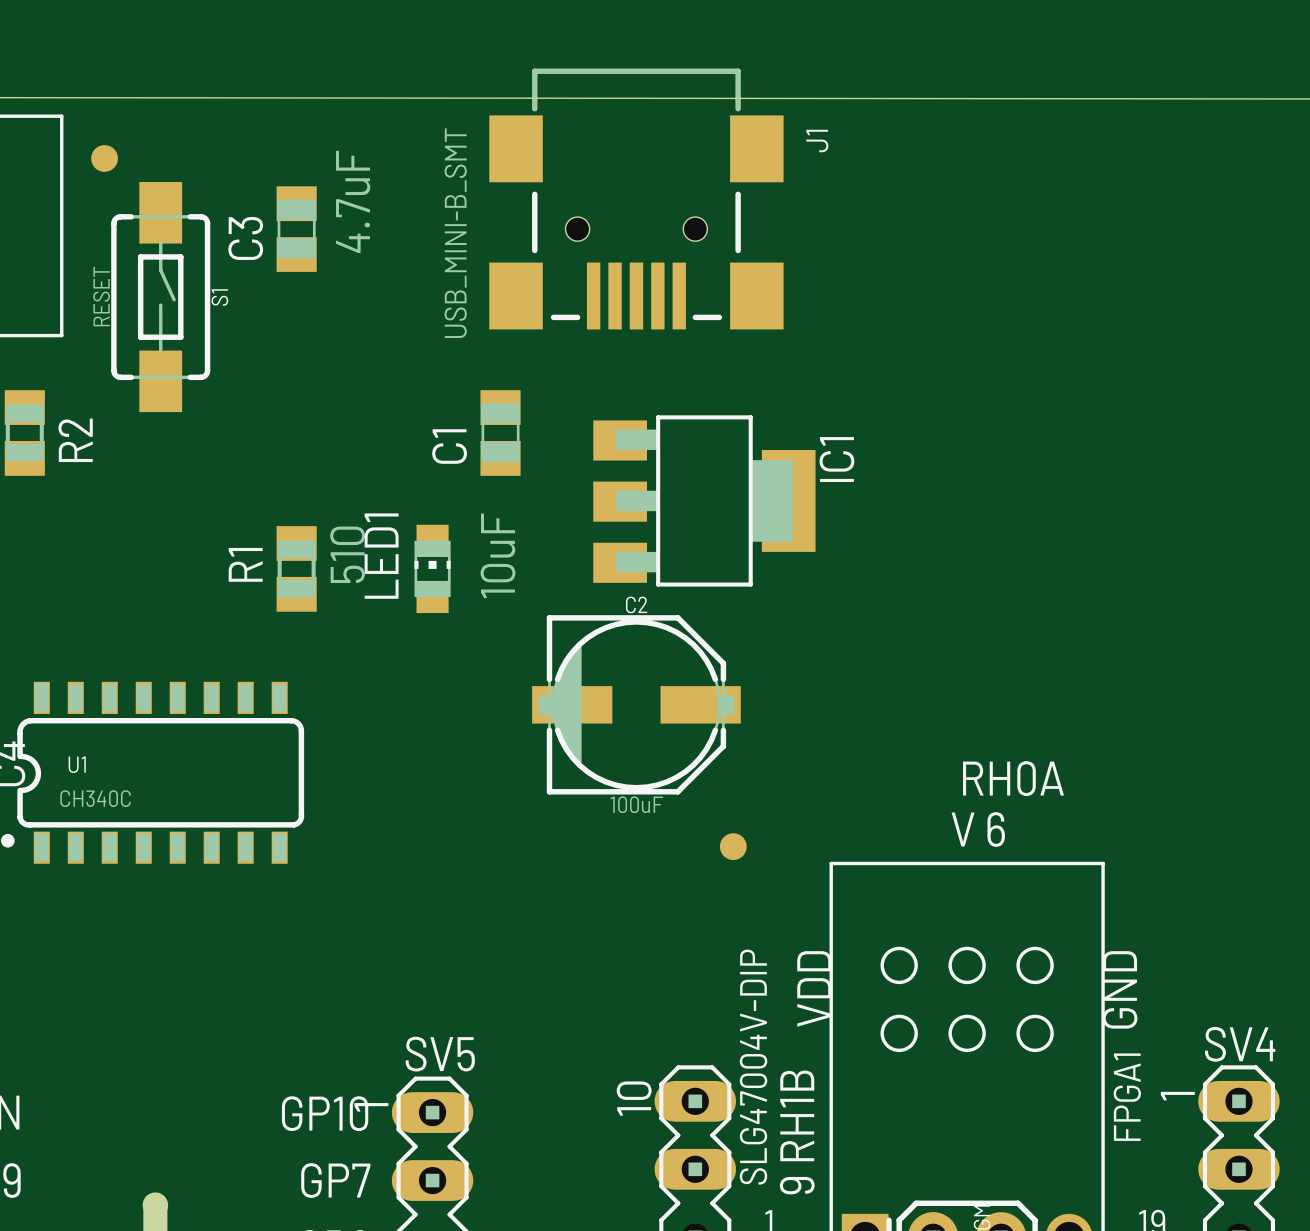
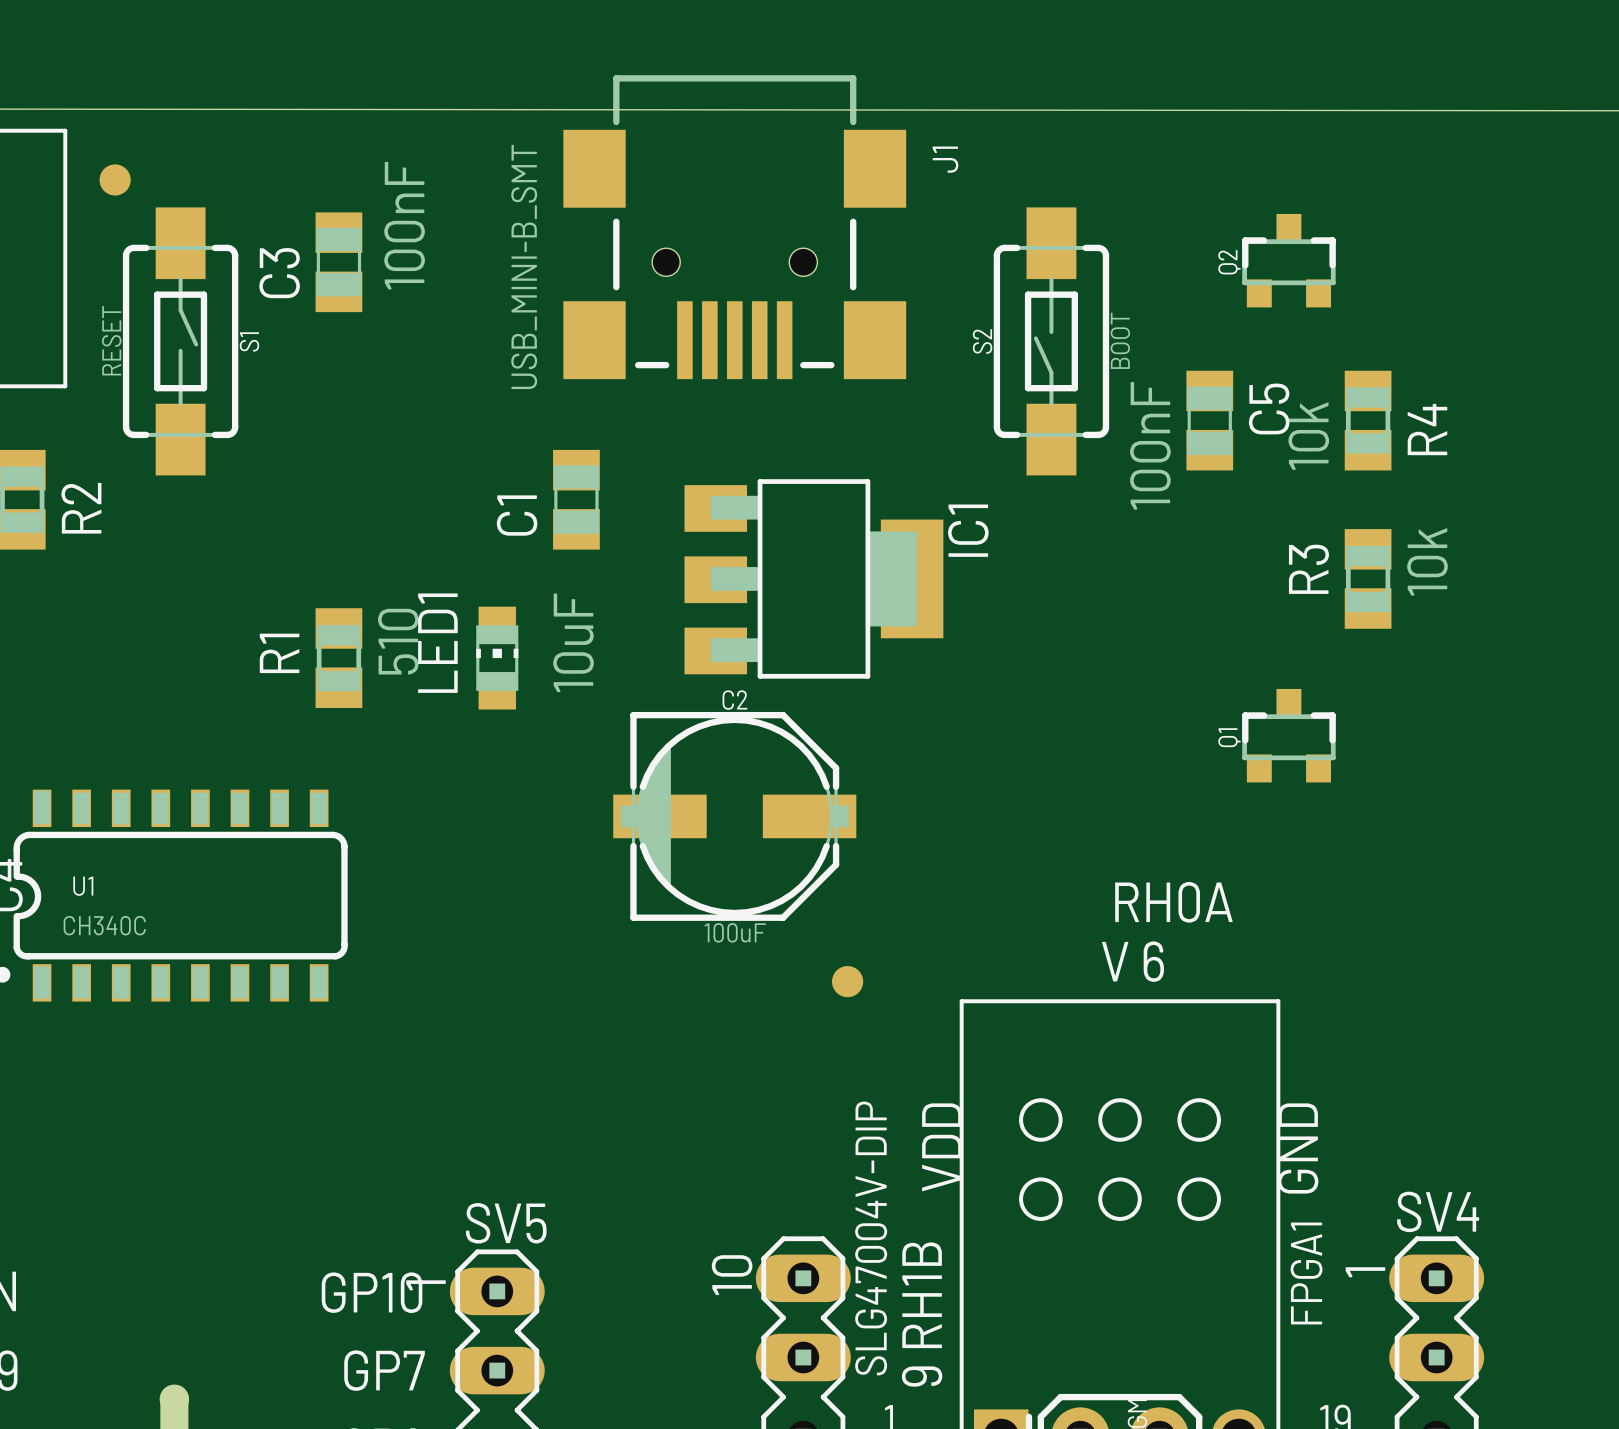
C3 value: 4.7uF (353, 201) -> 100nF (404, 225)
Q2: none -> (1288, 260)
S2: none -> BOOT (1051, 341)
C5: none -> 100nF (1209, 420)
R4: none -> 10k (1368, 420)
R3: none -> 10k (1368, 578)
Q1: none -> (1288, 735)

